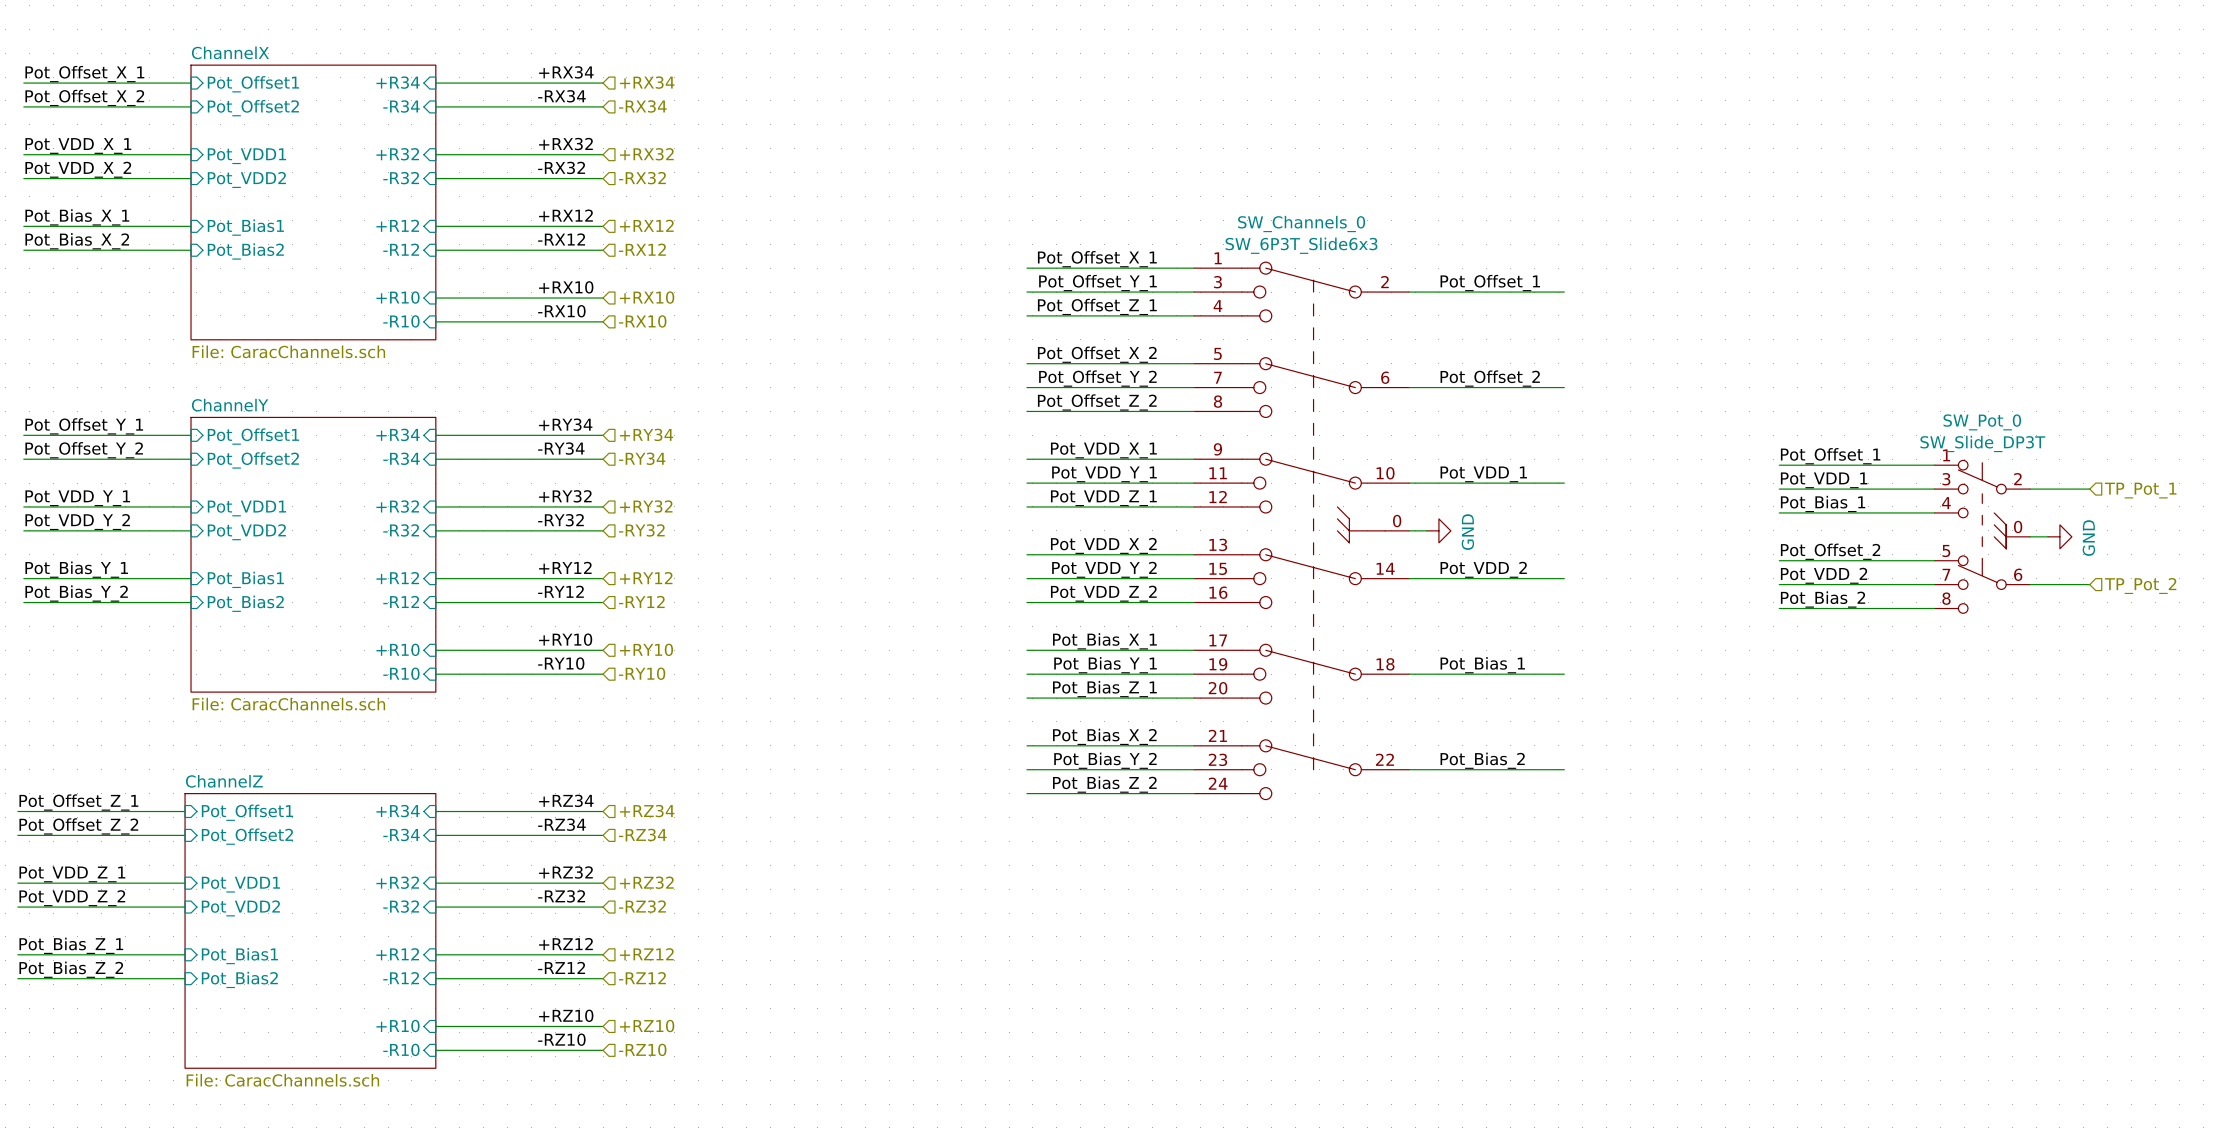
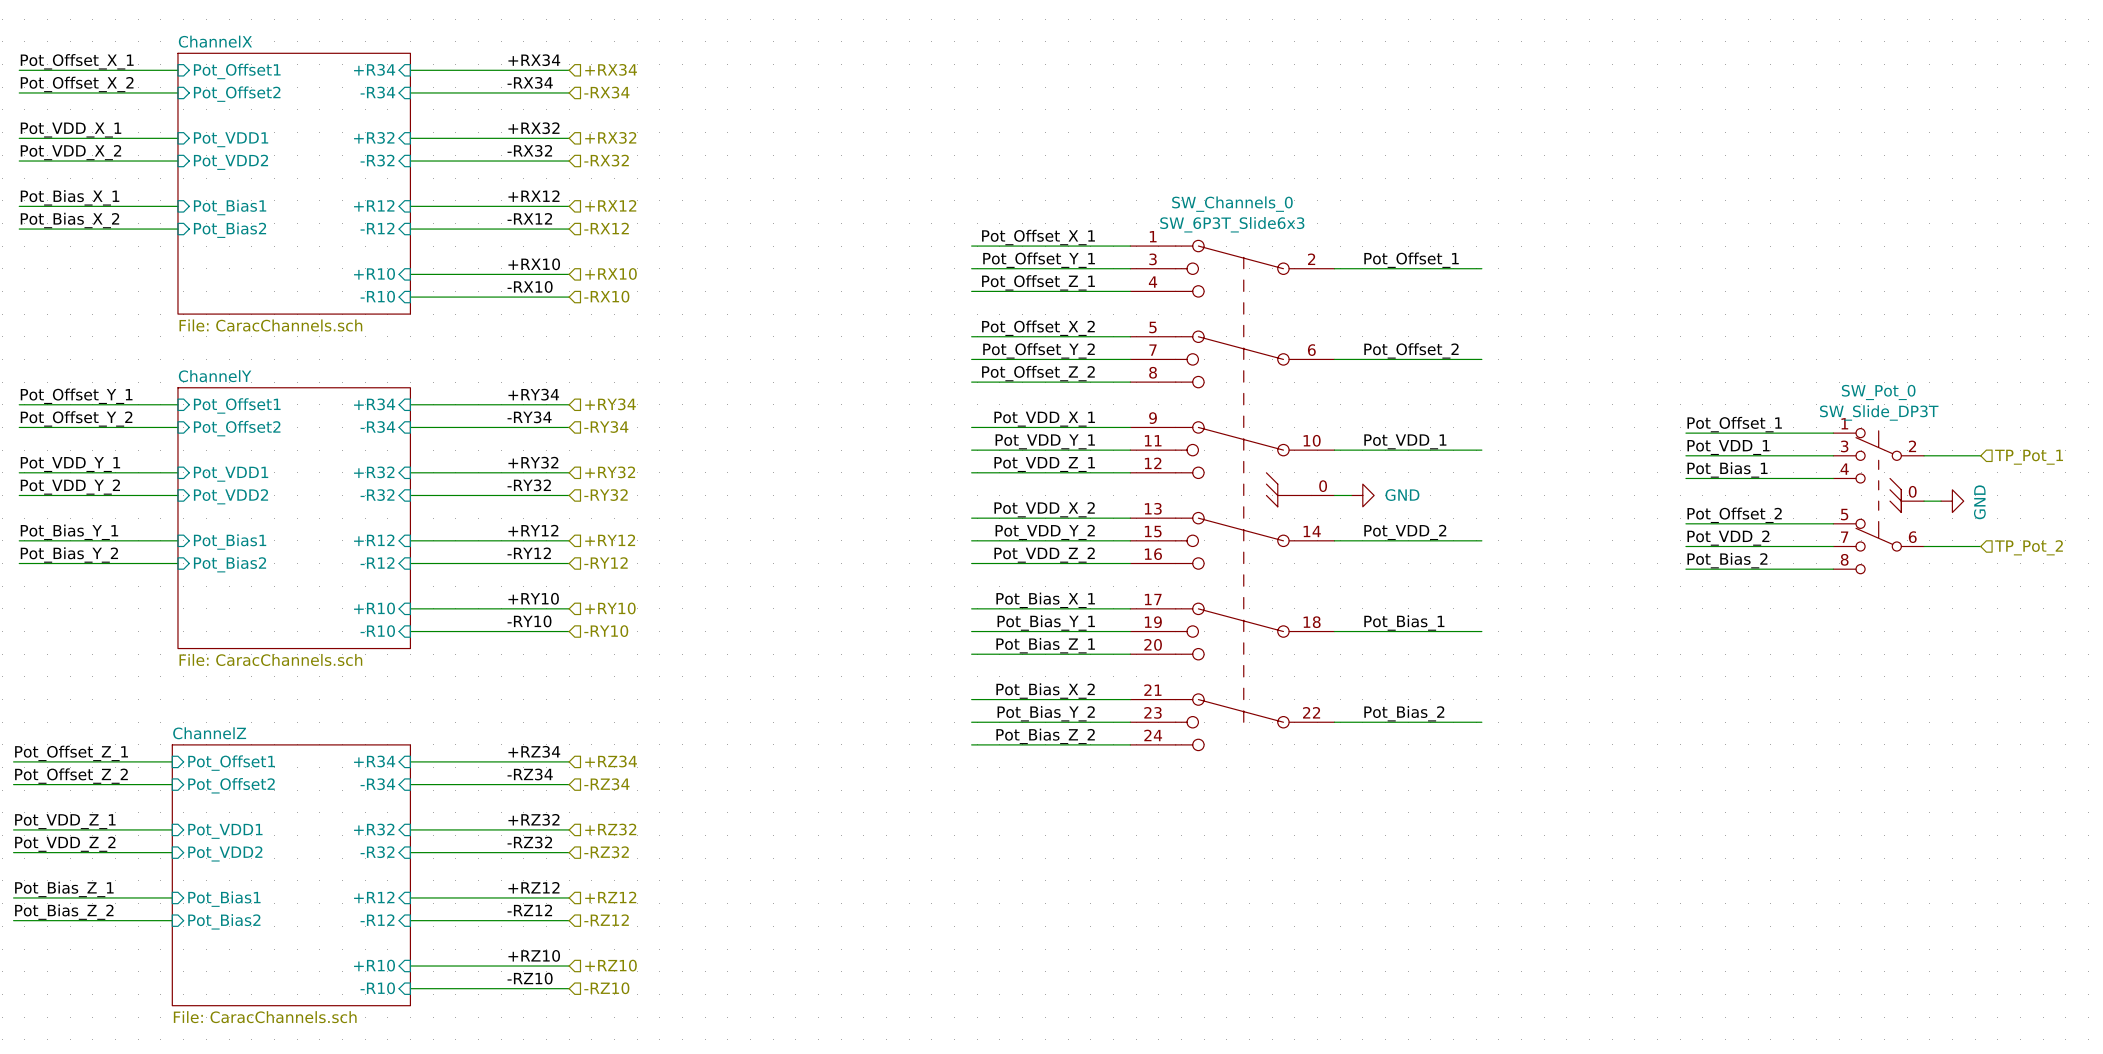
power symbol text rotation: 0° (1467, 532) -> 90° clockwise (1402, 495)

